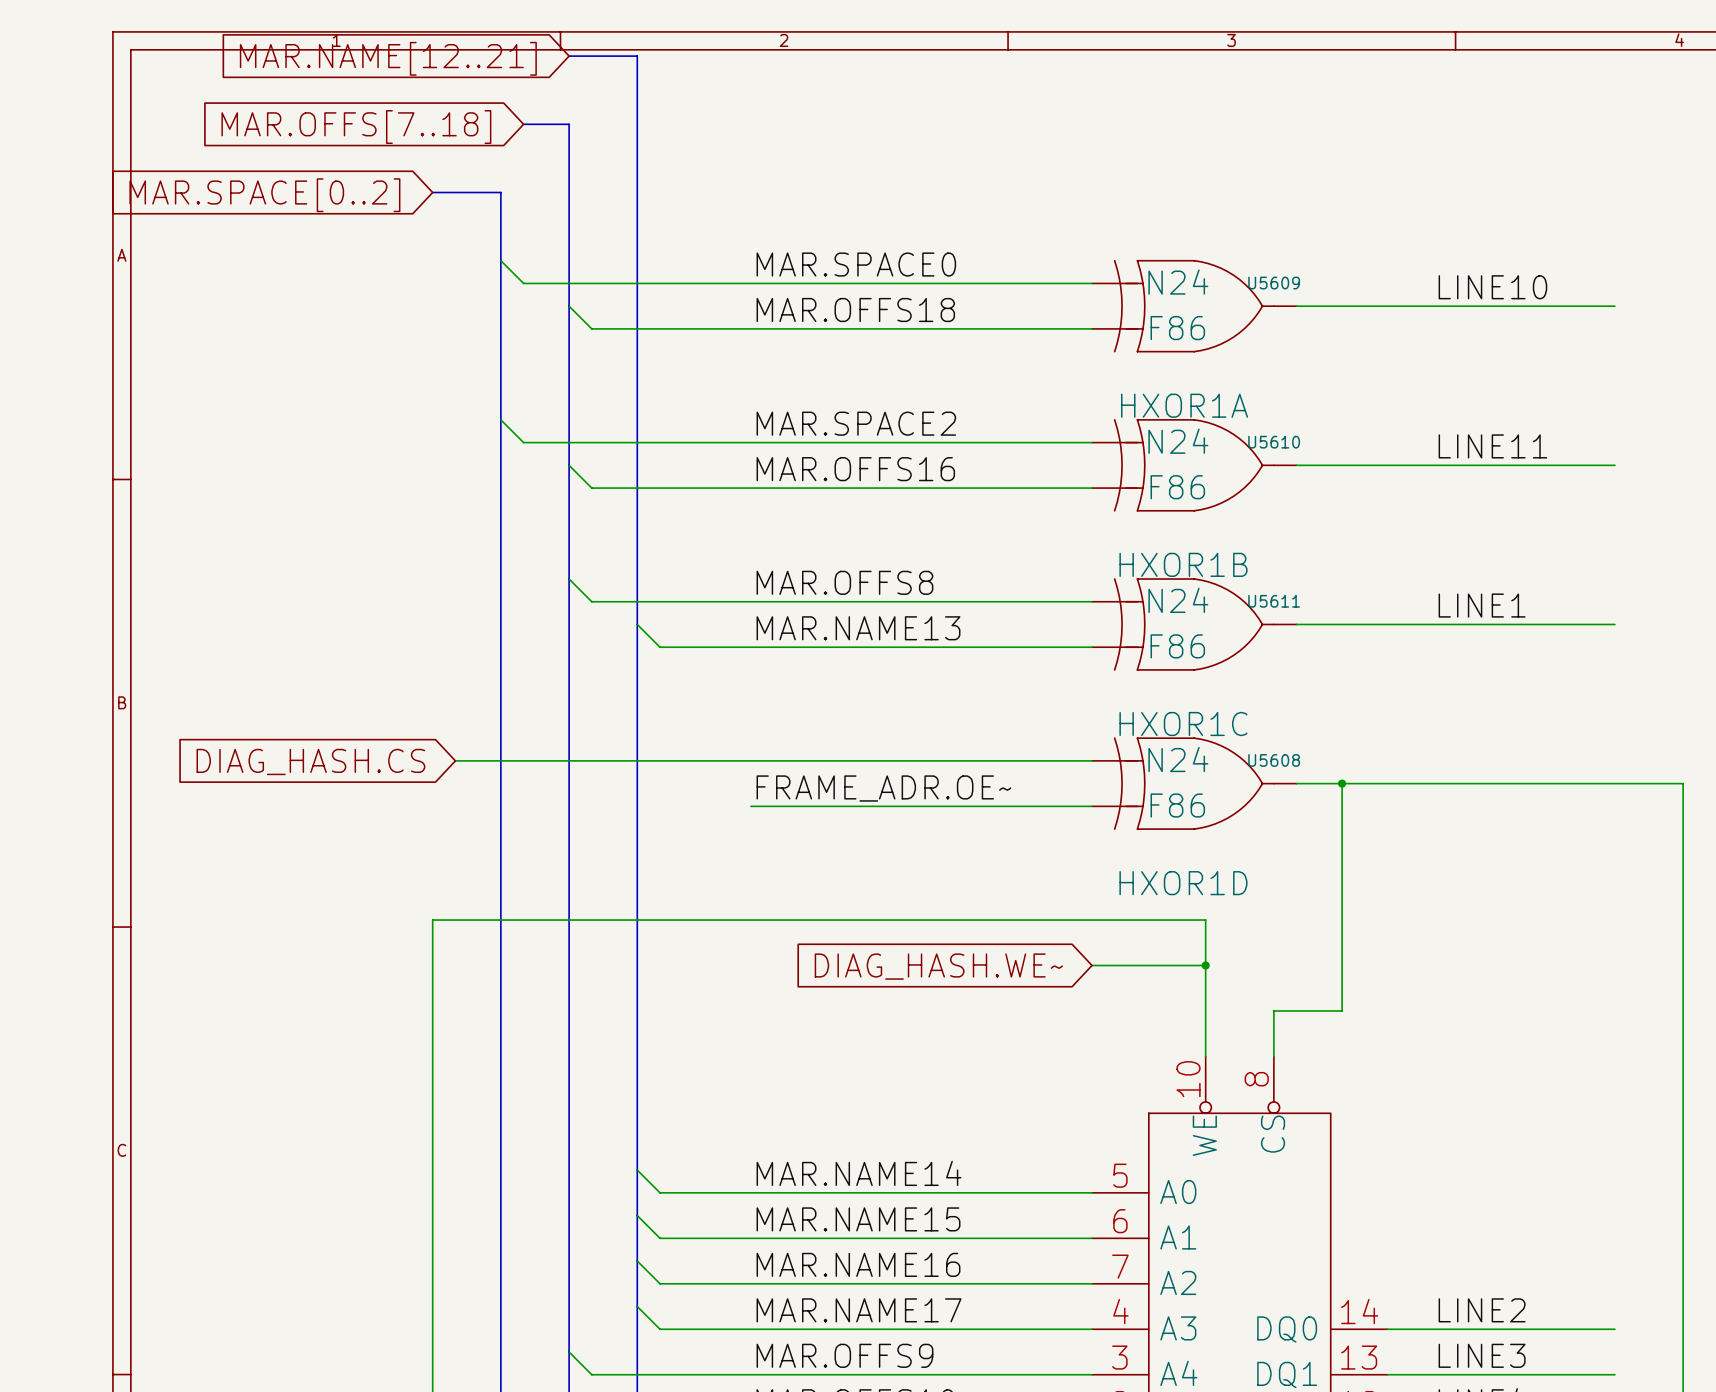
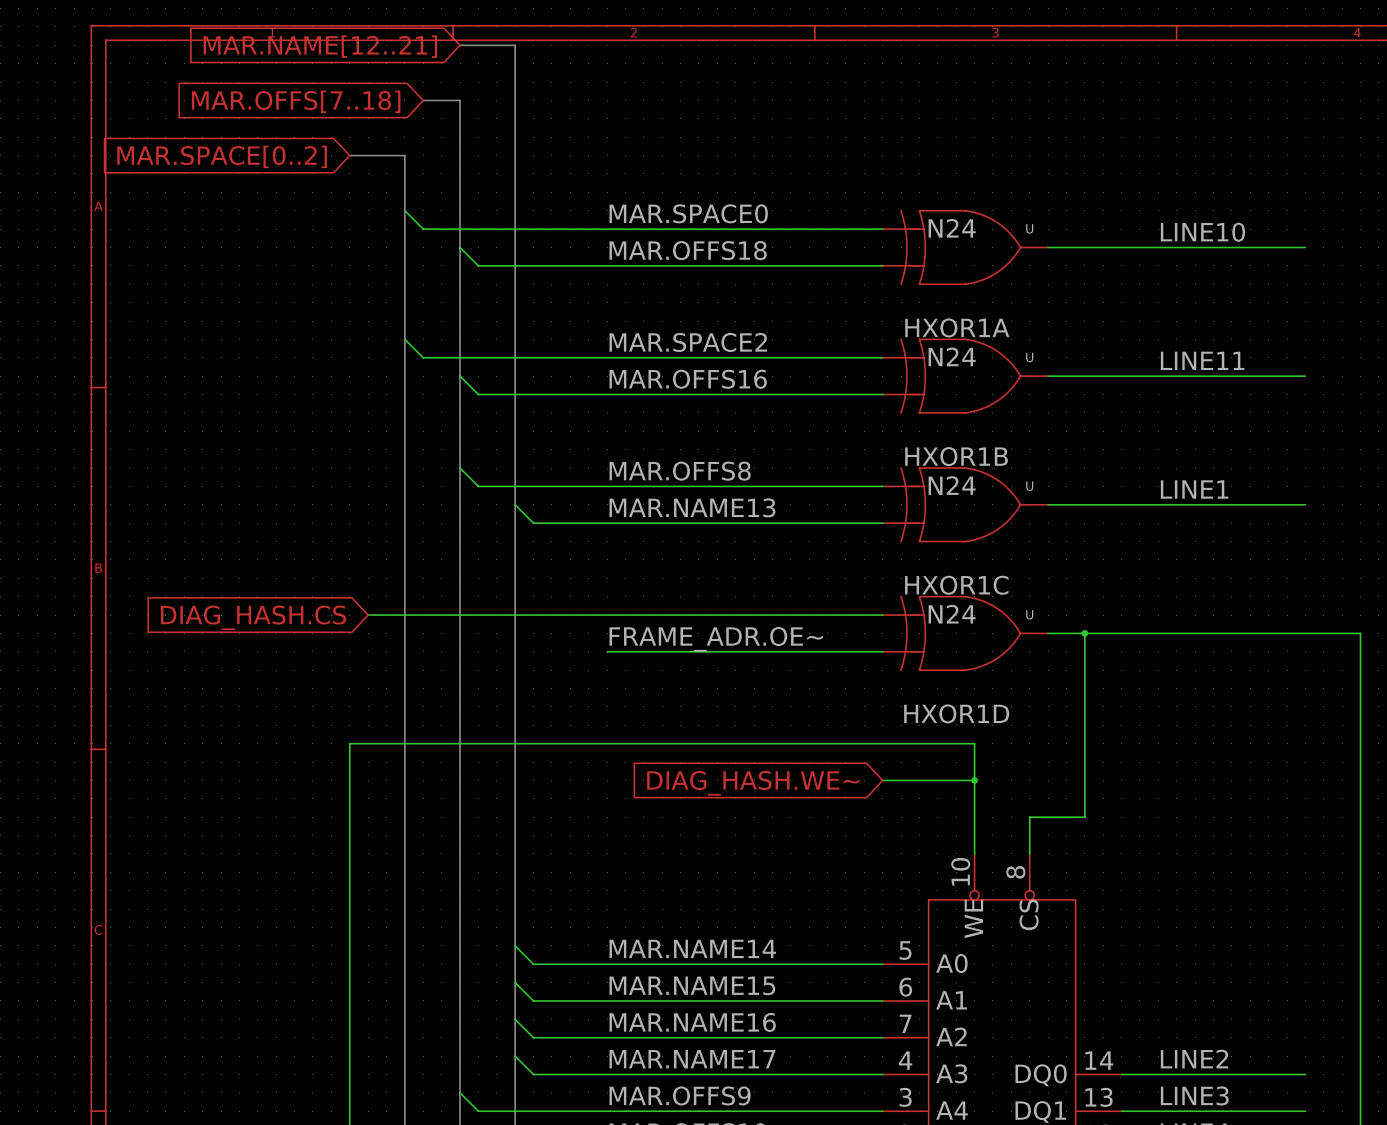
U5609 name: U5609 (1274, 283) -> U (1029, 228)
U5609 value: F86 (1177, 328) -> none
U5610 name: U5610 (1274, 442) -> U (1029, 357)
U5610 value: F86 (1177, 487) -> none
U5611 name: U5611 (1274, 601) -> U (1029, 486)
U5611 value: F86 (1177, 646) -> none
U5608 name: U5608 (1274, 760) -> U (1029, 614)
U5608 value: F86 (1177, 805) -> none

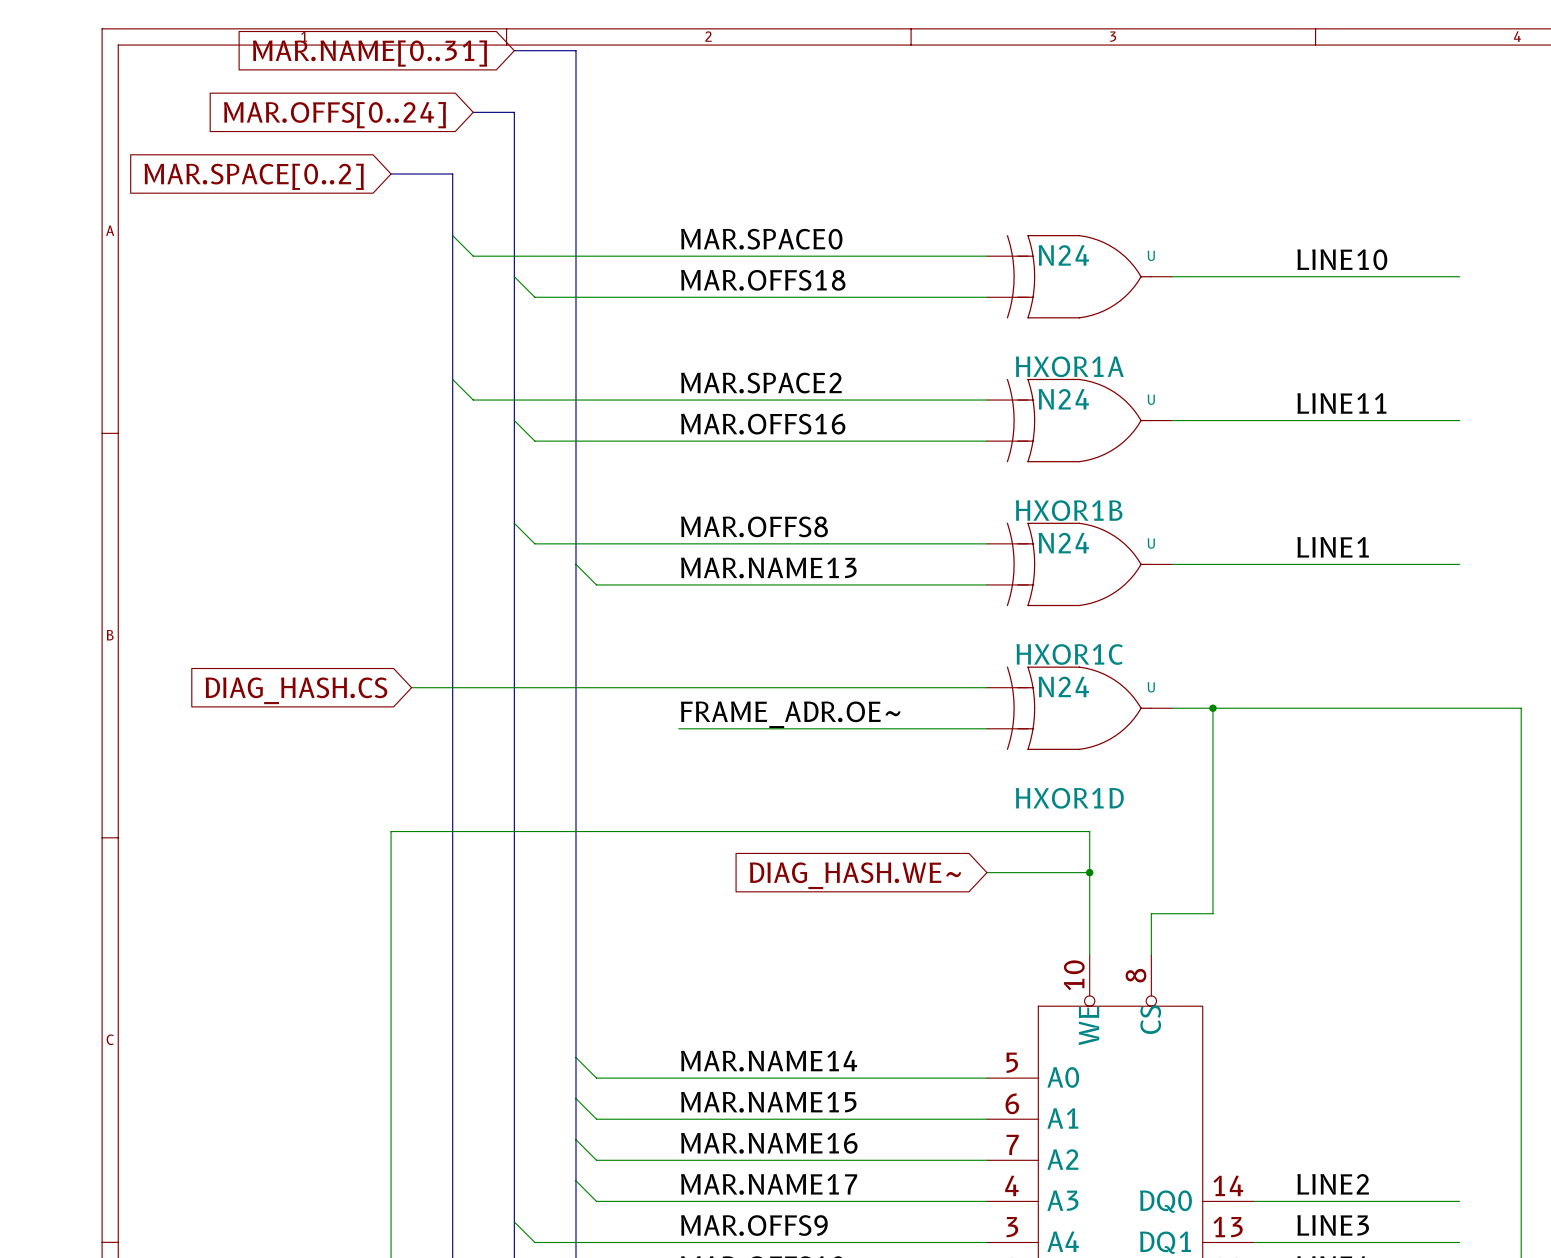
global label: MAR.NAME[12..21] (320, 46) -> MAR.NAME[0..31] (370, 53)
global label: MAR.OFFS[7..18] (296, 101) -> MAR.OFFS[0..24] (335, 115)

